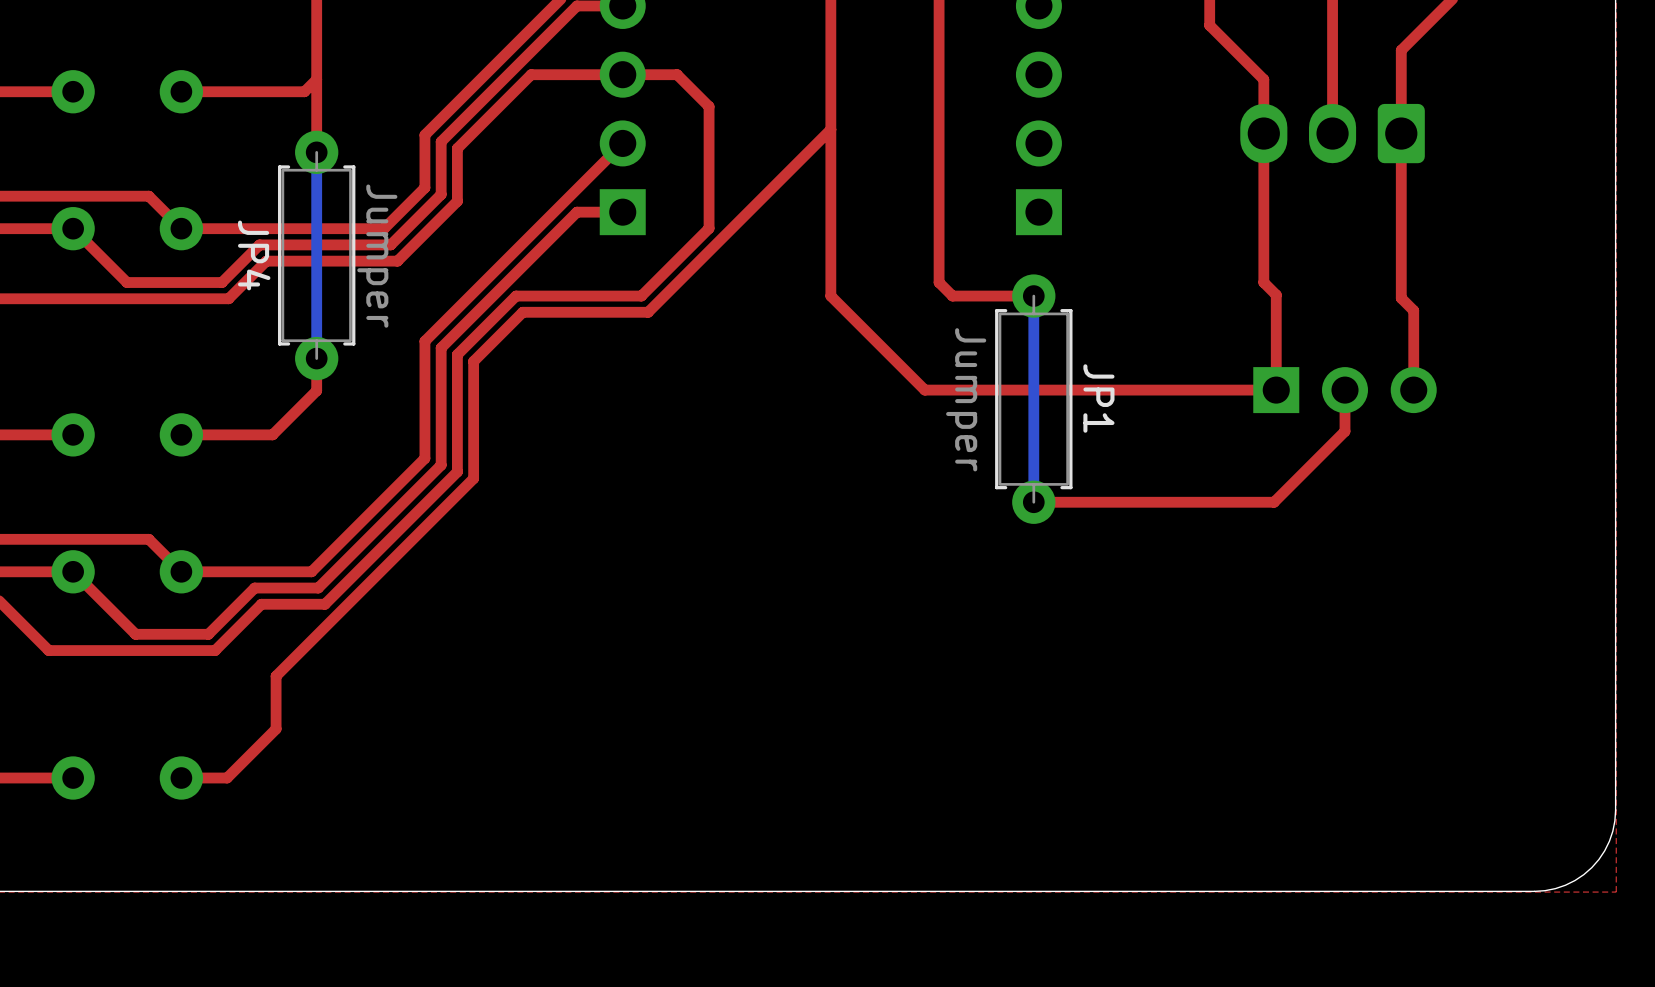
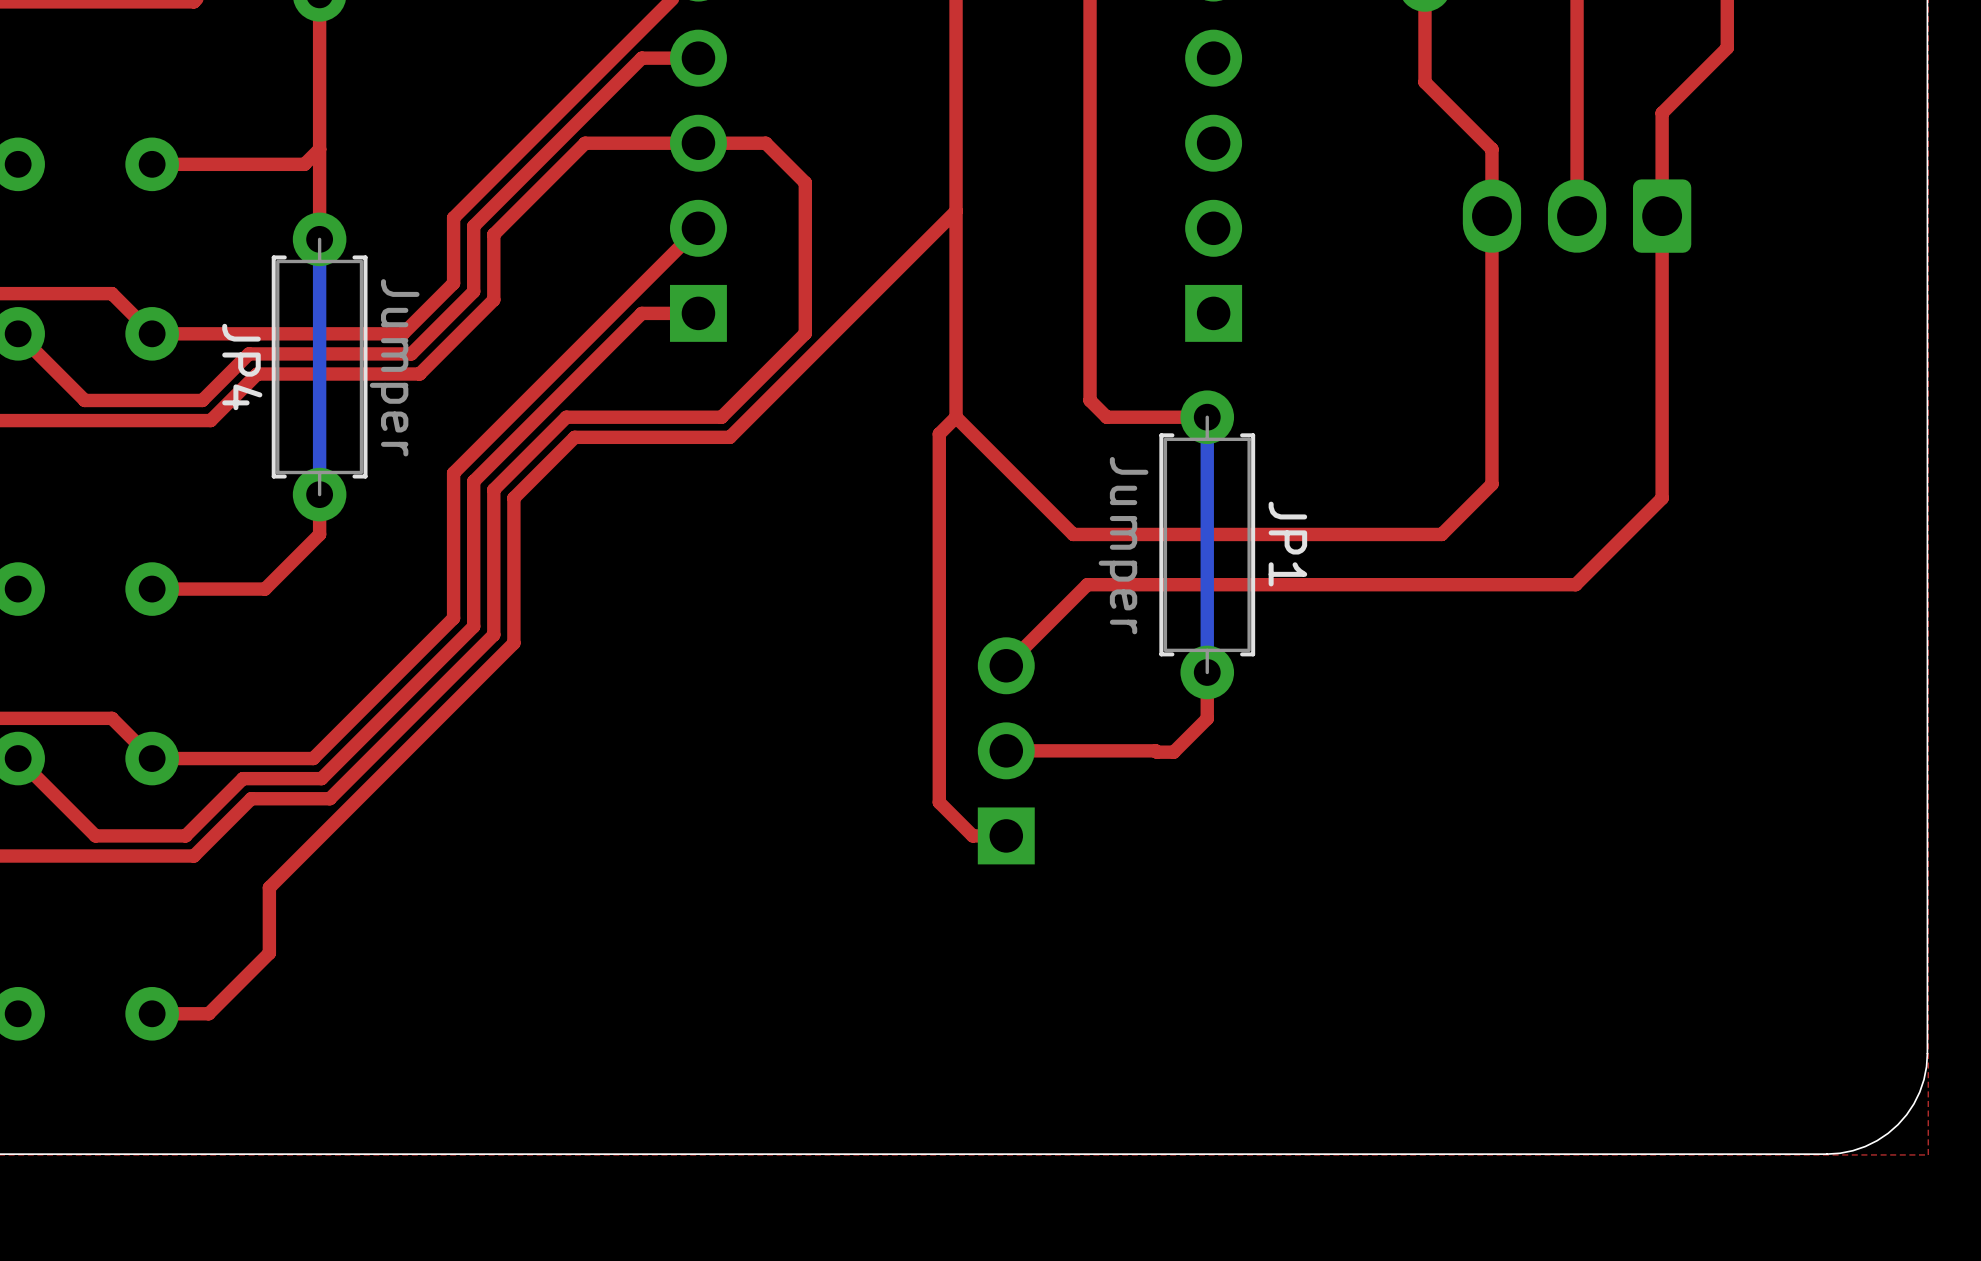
top track: (1263, 282) (1276, 294) (1276, 390) (924, 390) -> (1491, 400) (1491, 484) (1441, 534) (1072, 533)
top track: none -> (956, 417) (939, 433) (939, 802) (972, 835) (1006, 835)
top track: (1401, 298) (1413, 310) (1413, 390) -> (1662, 419) (1662, 498) (1575, 584) (1087, 584) (1006, 665)
top track: (1345, 390) (1345, 431) (1274, 502) (1033, 502) -> (1006, 750) (1173, 752) (1207, 718) (1207, 672)
part rotation: 0° (1345, 390) -> 90° counterclockwise (1006, 750)
part position: (1345, 390) -> (1006, 750)

